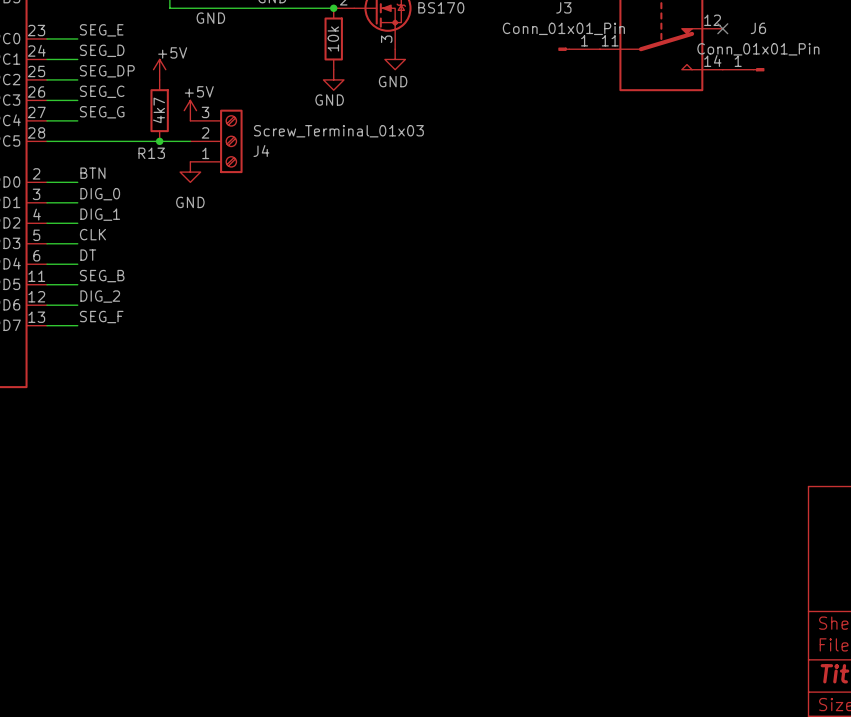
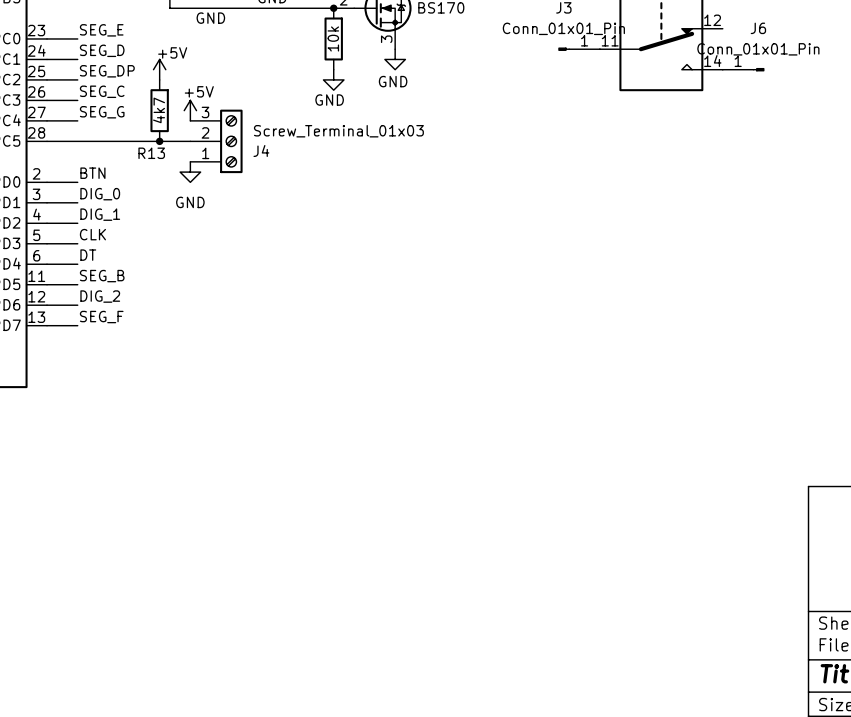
no-connect mark: (722, 28) -> none

